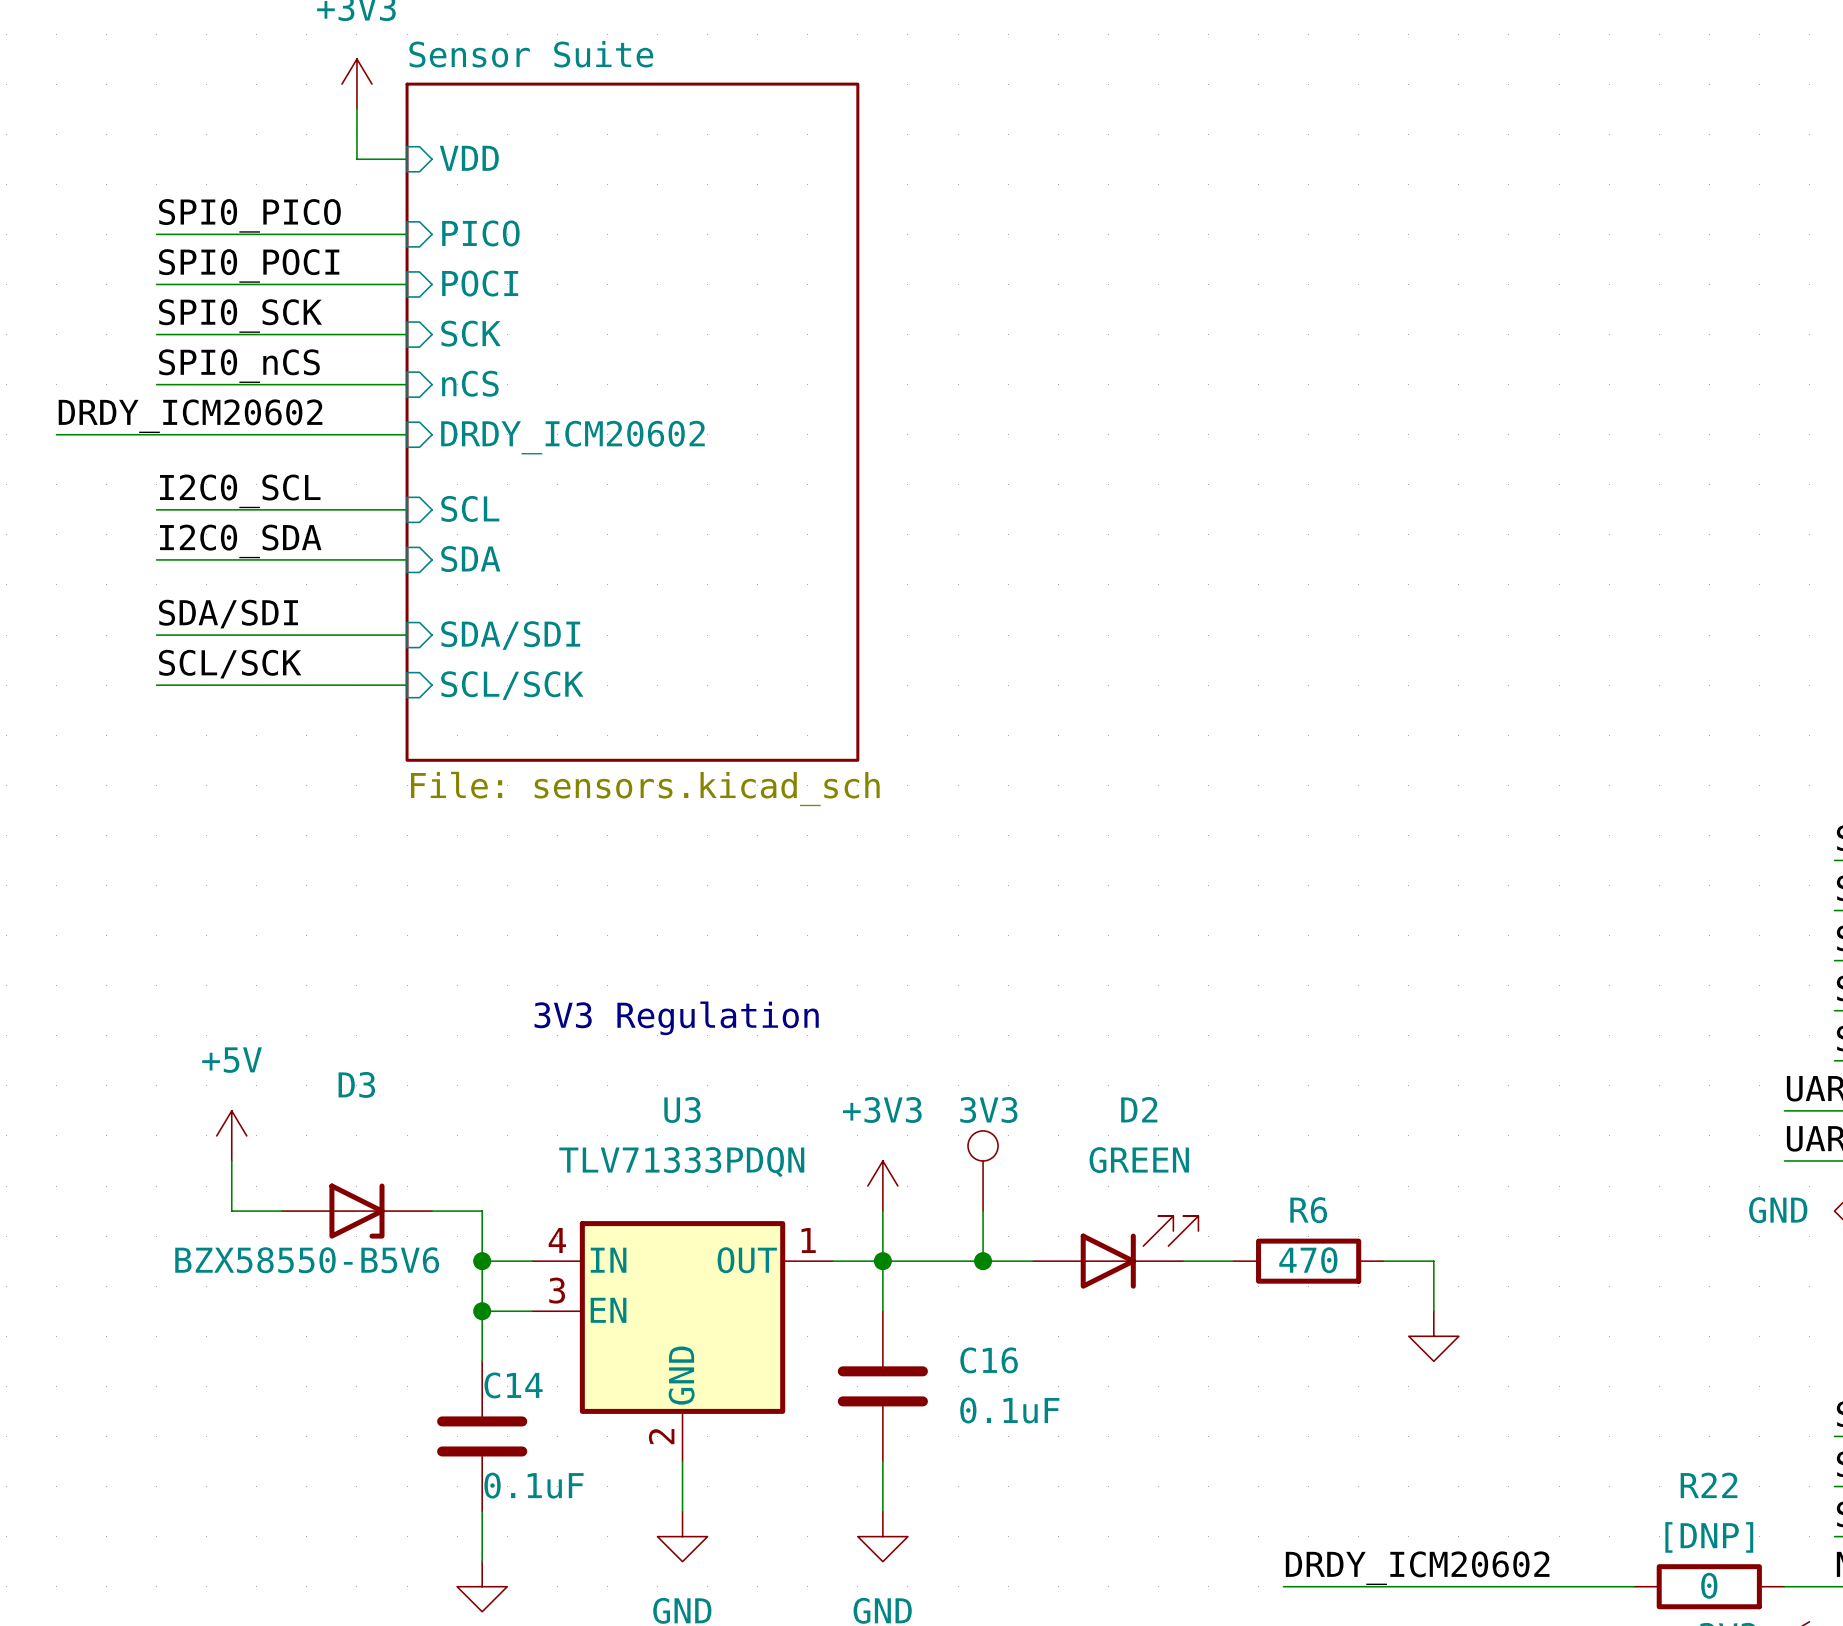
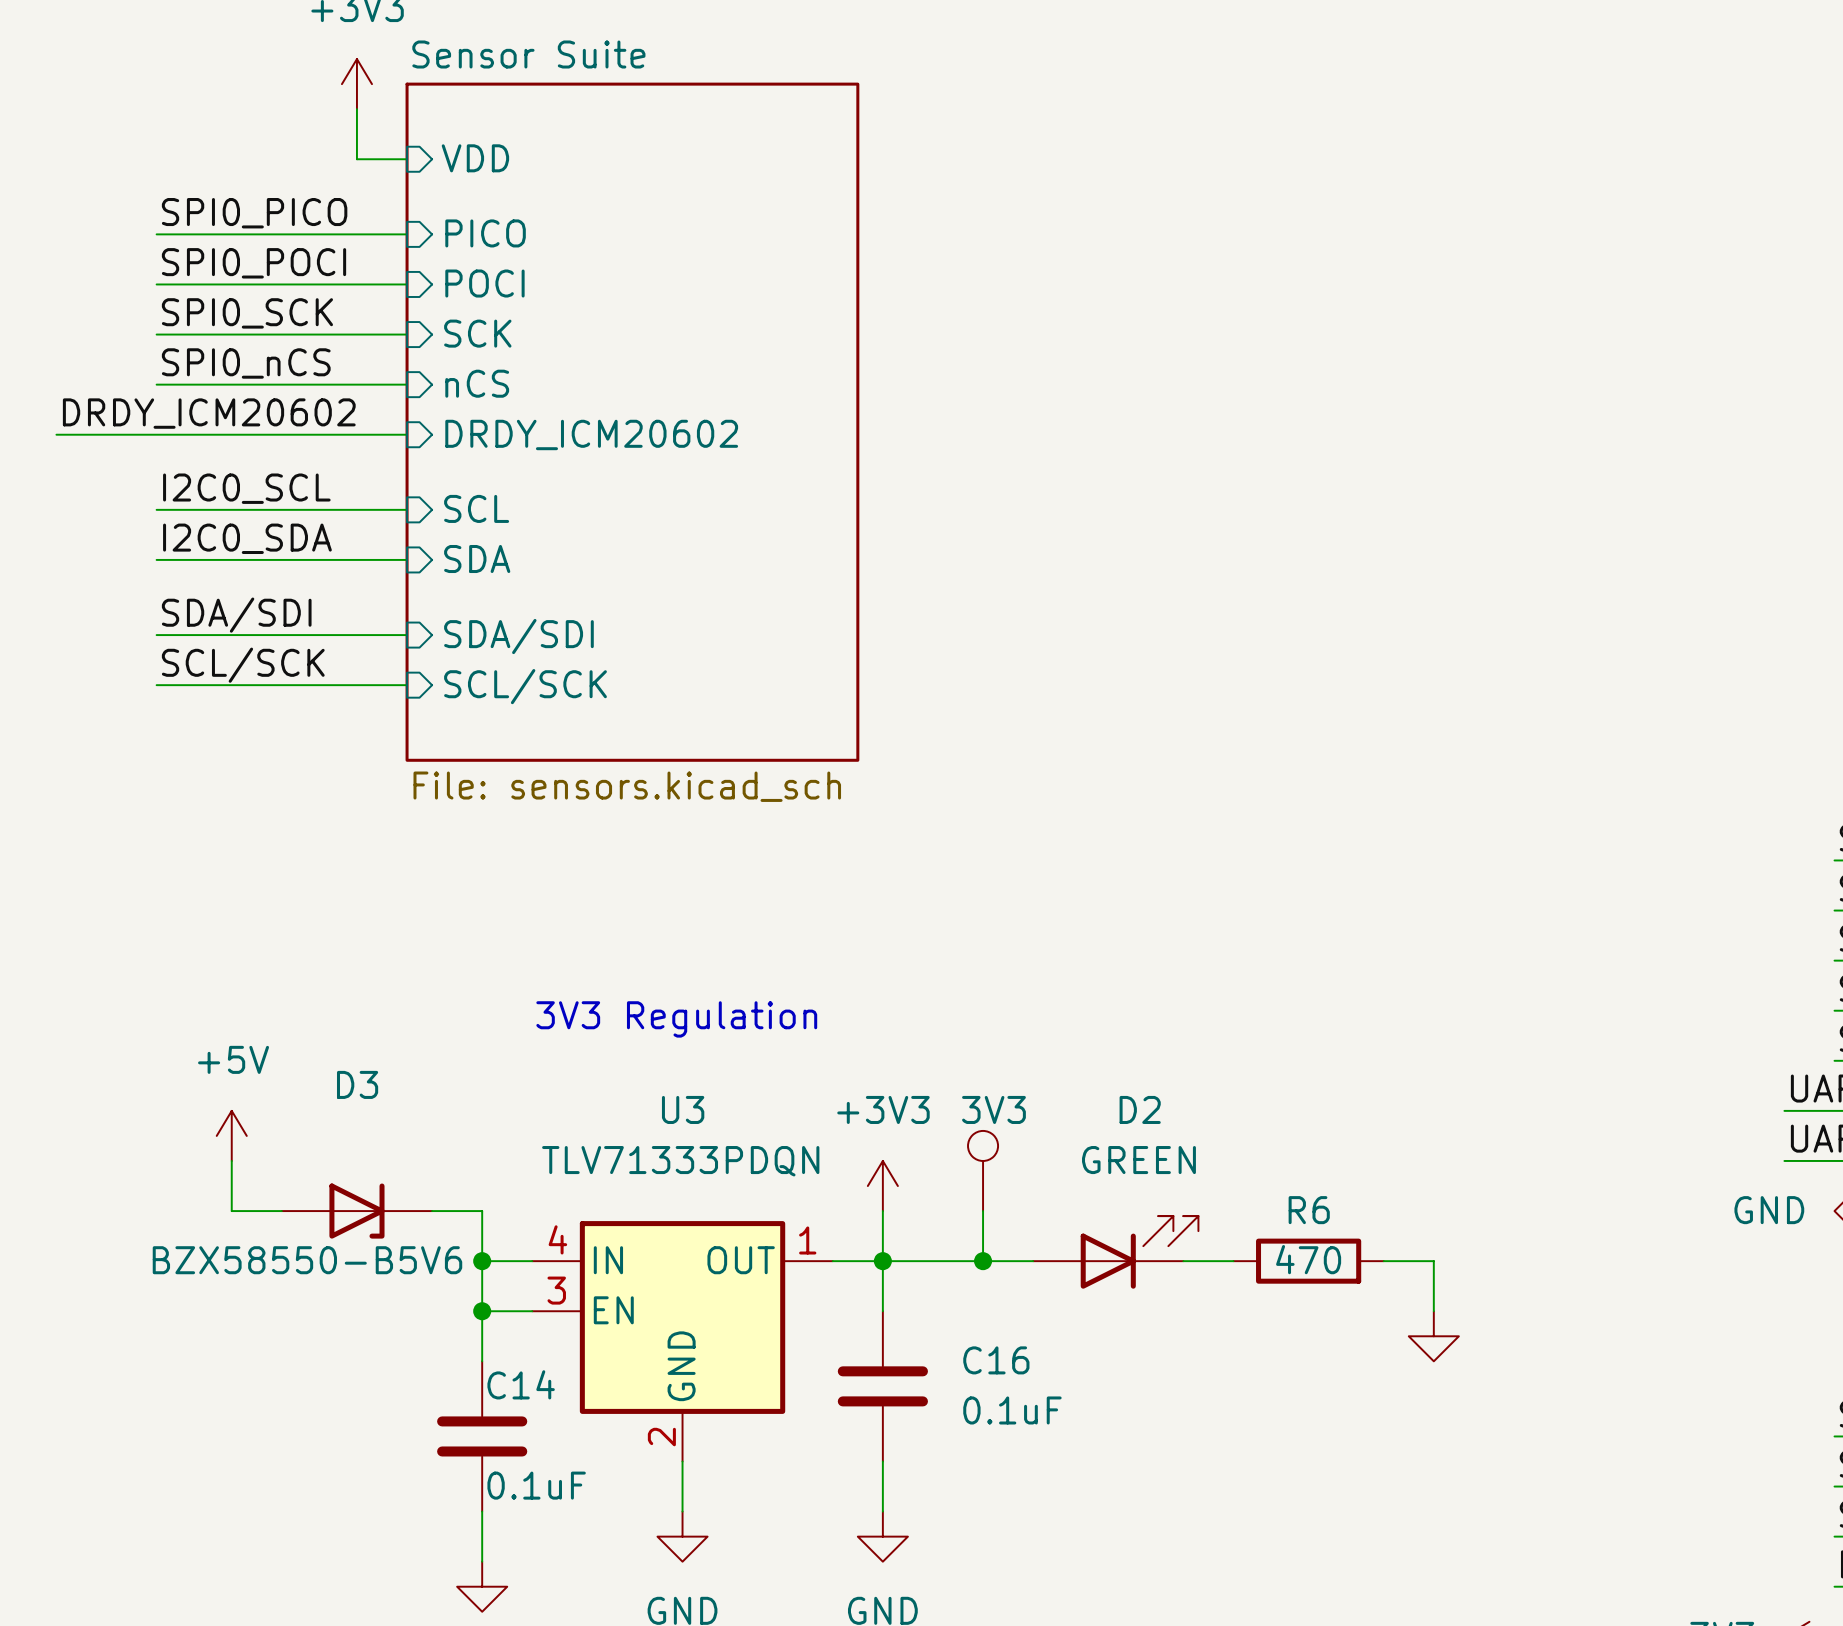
label: DRDY_ICM20602 (1417, 1568) -> none
wire: (1283, 1586) (1634, 1586) -> none
R22: 0 (1709, 1586) -> none
wire: (1784, 1586) (1834, 1586) -> none

